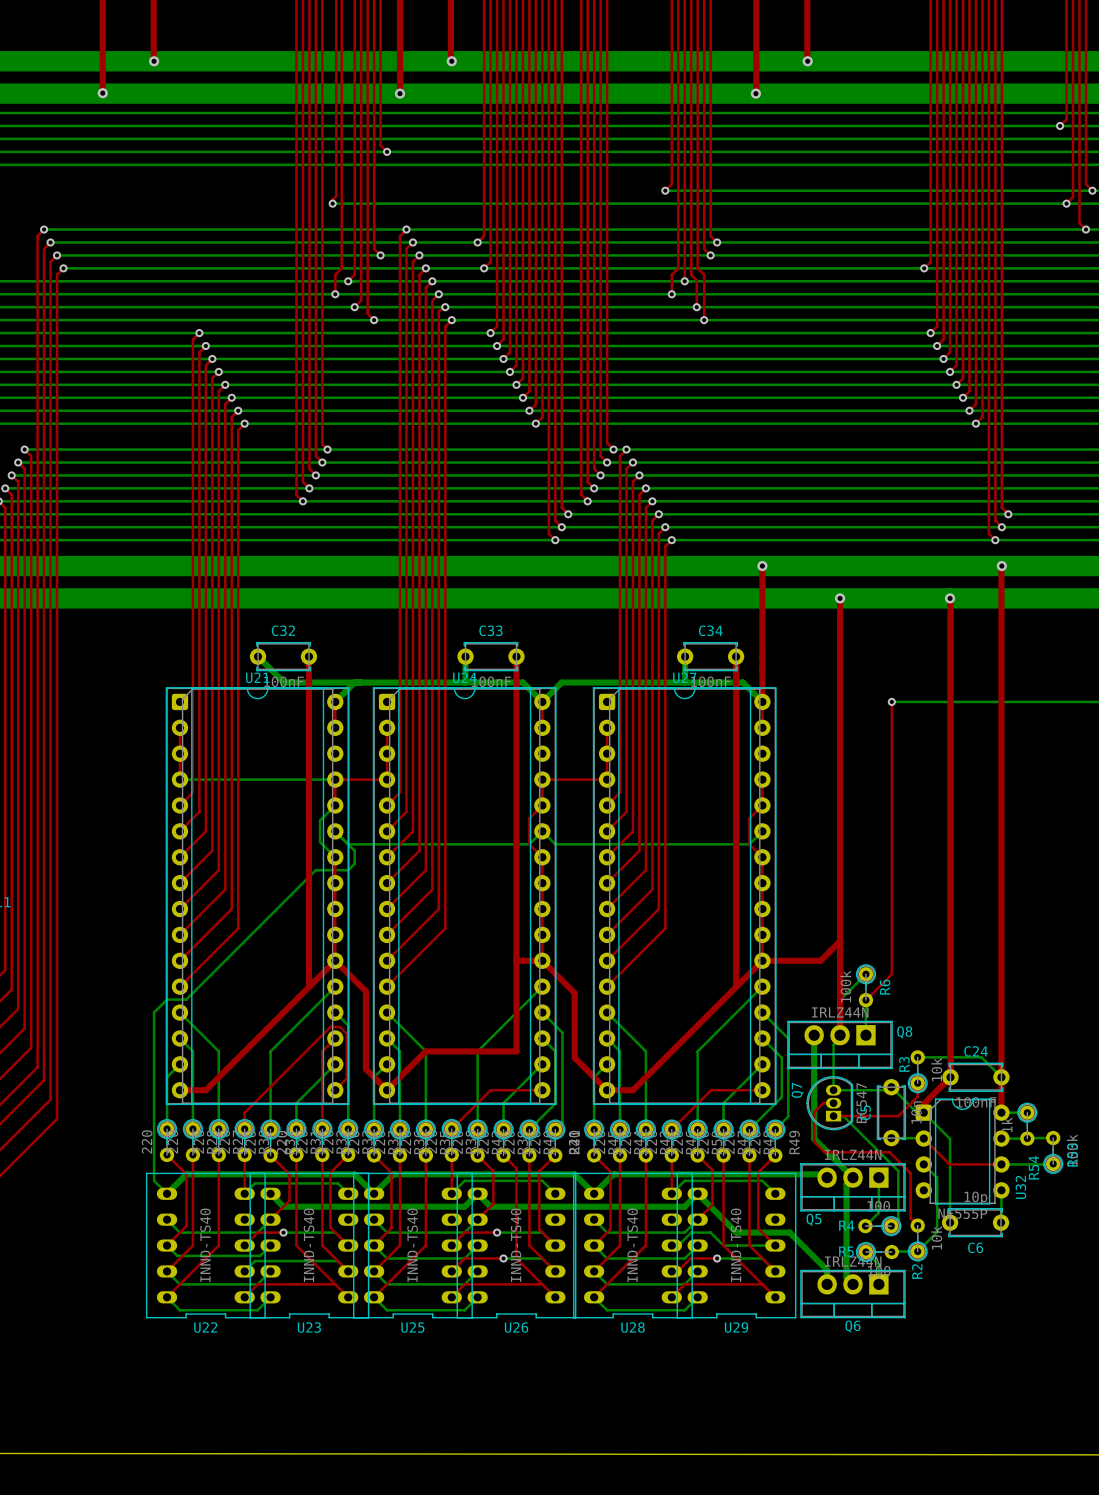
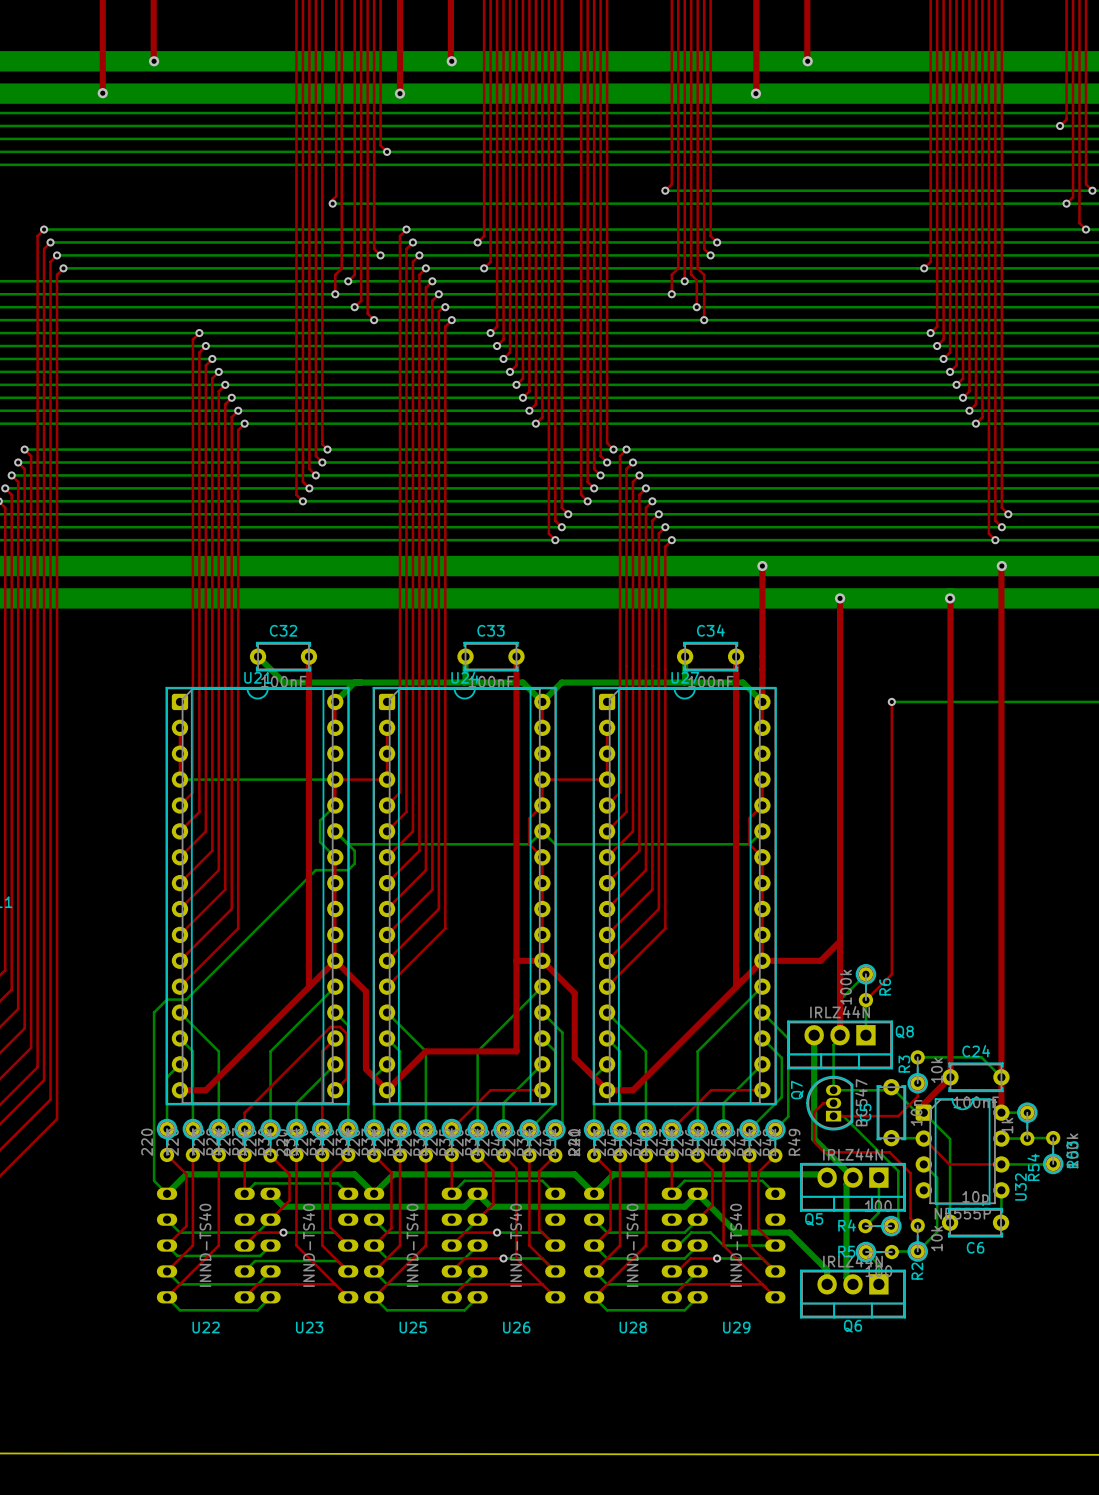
U22 footprint: [146, 1172, 266, 1319] -> [156, 1187, 255, 1304]
U23 footprint: [249, 1172, 370, 1319] -> [260, 1187, 359, 1304]
U25 footprint: [353, 1172, 473, 1319] -> [363, 1187, 462, 1304]
U26 footprint: [456, 1172, 577, 1319] -> [467, 1187, 566, 1304]
U28 footprint: [573, 1172, 693, 1319] -> [583, 1187, 682, 1304]
U29 footprint: [676, 1172, 797, 1319] -> [687, 1187, 786, 1304]

